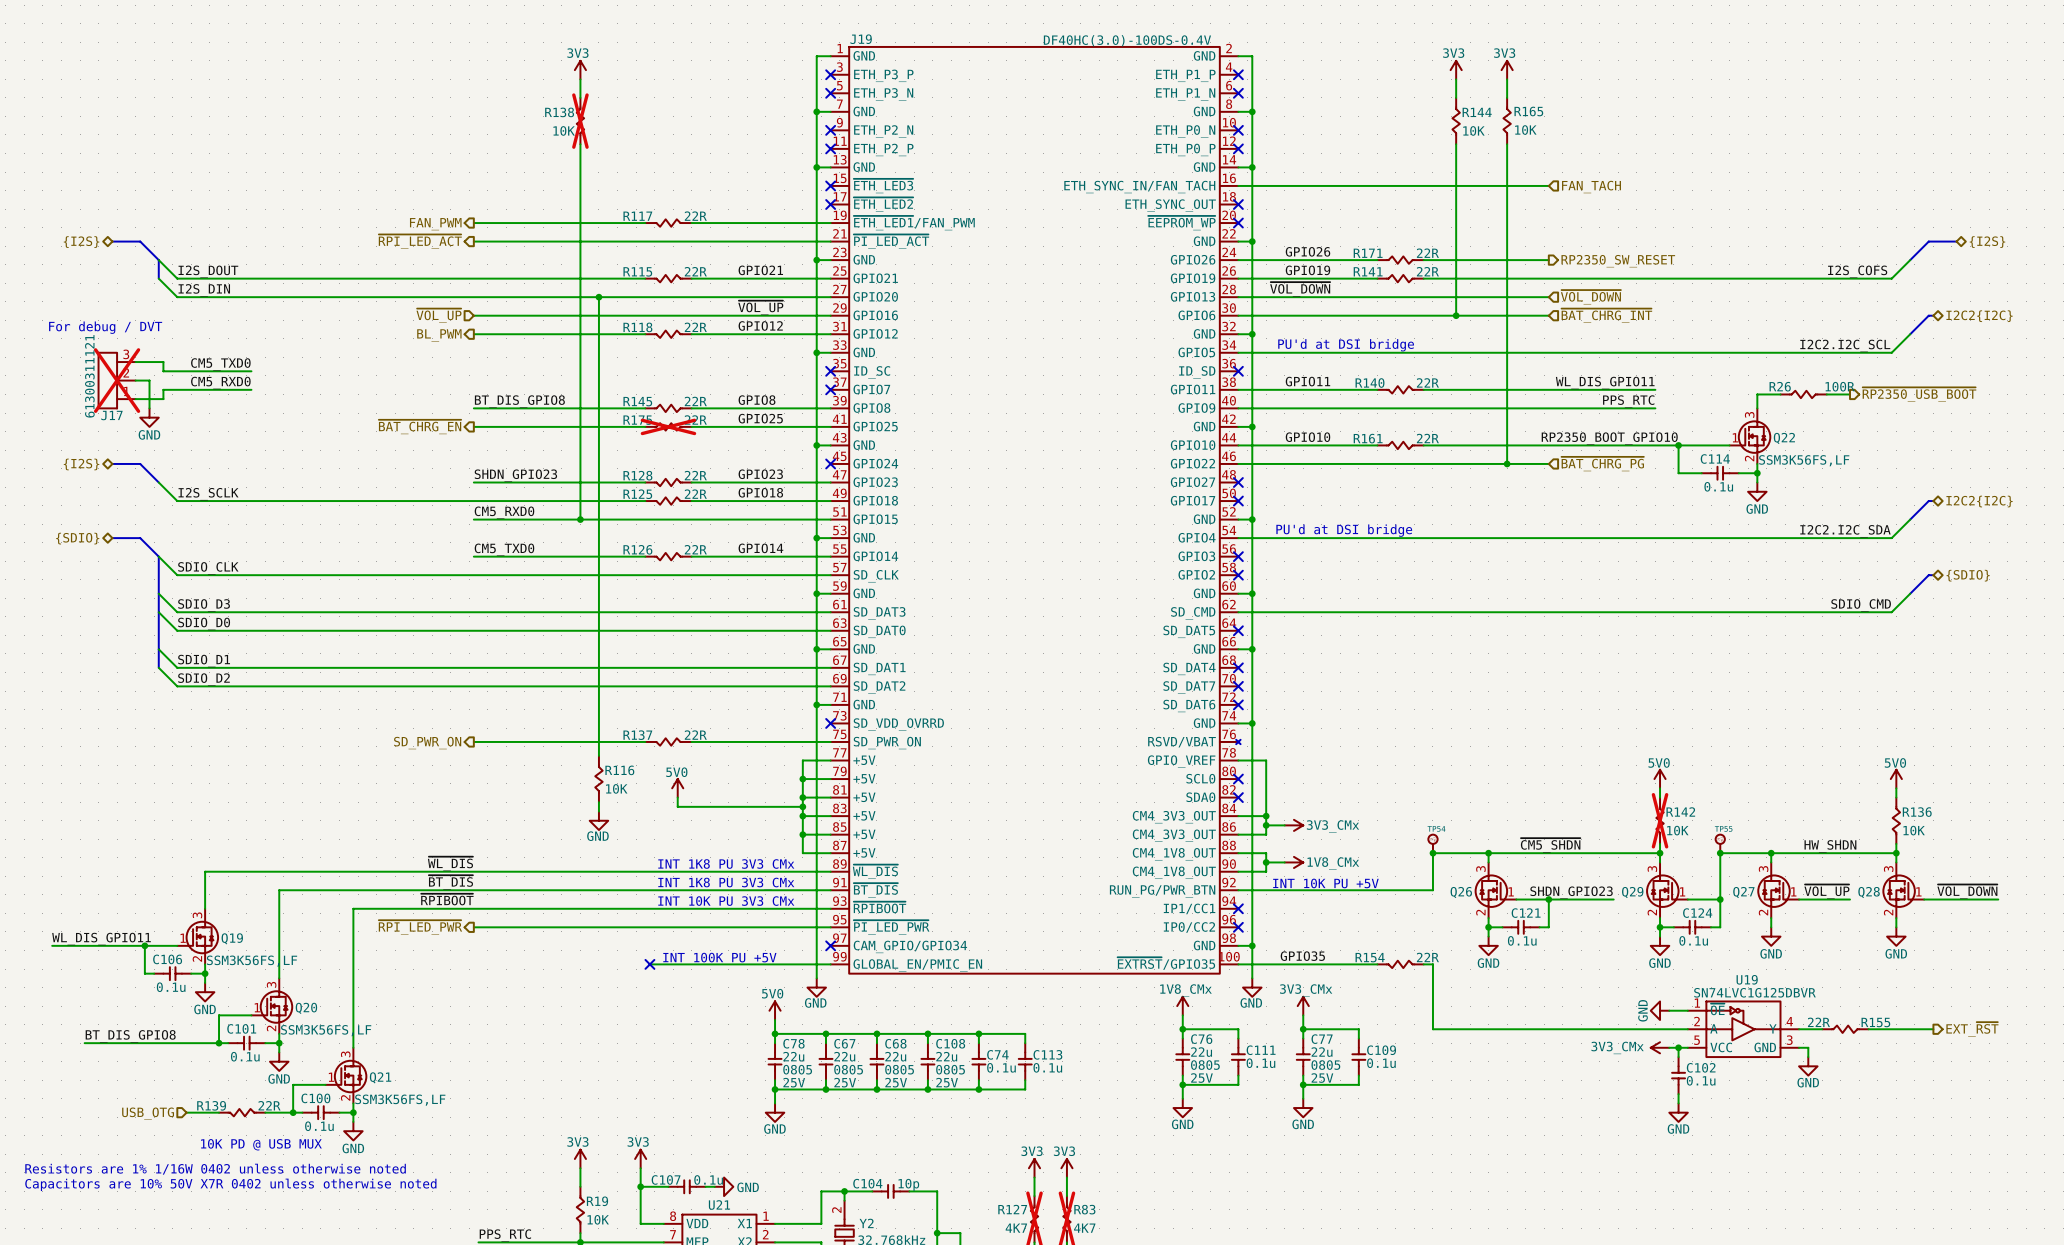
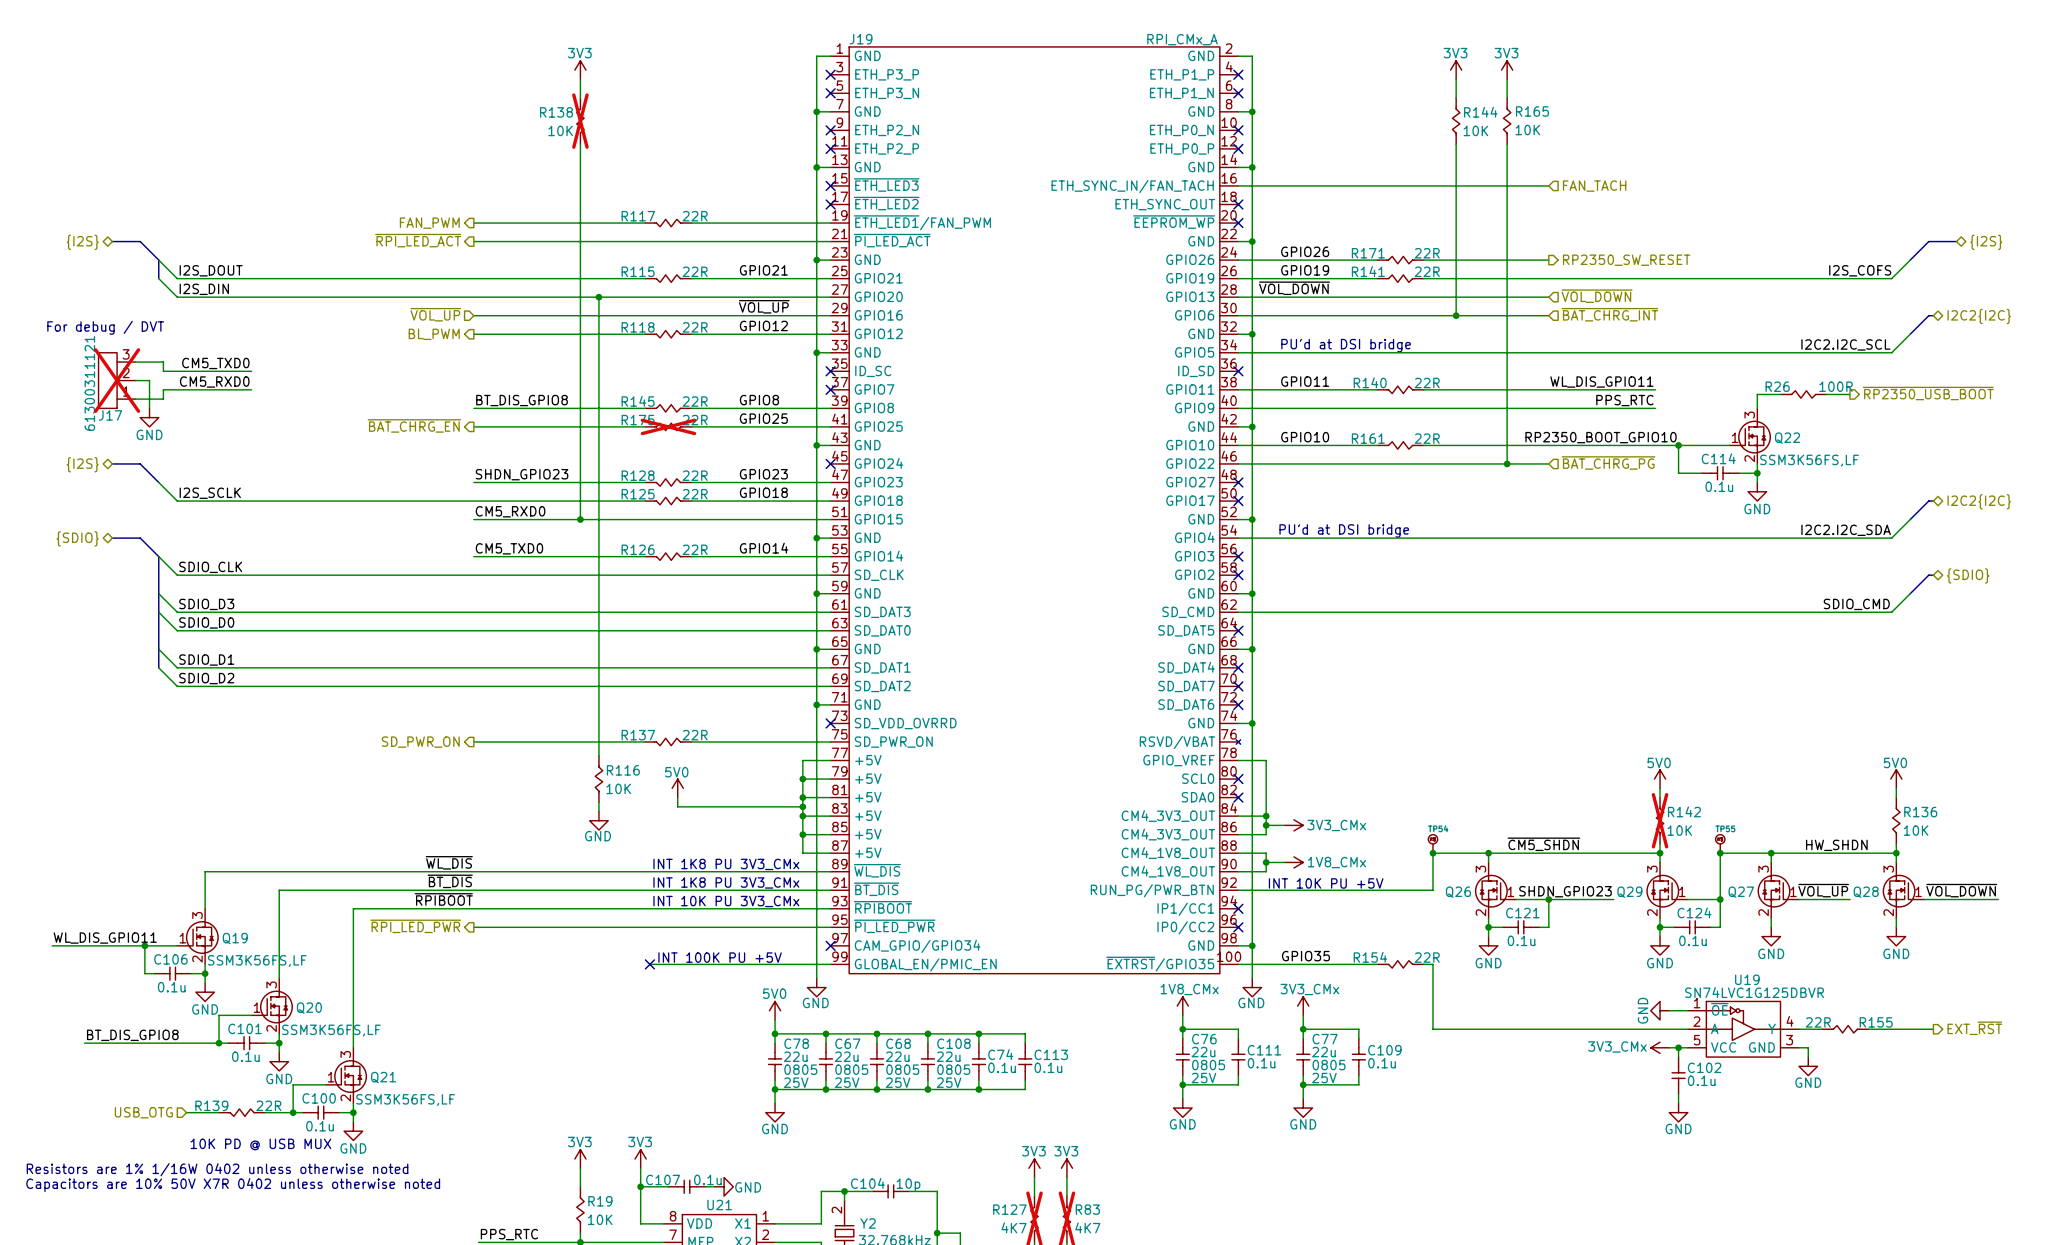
J19 value: DF40HC(3.0)-100DS-0.4V (1127, 40) -> RPI_CMx_A (1182, 39)

